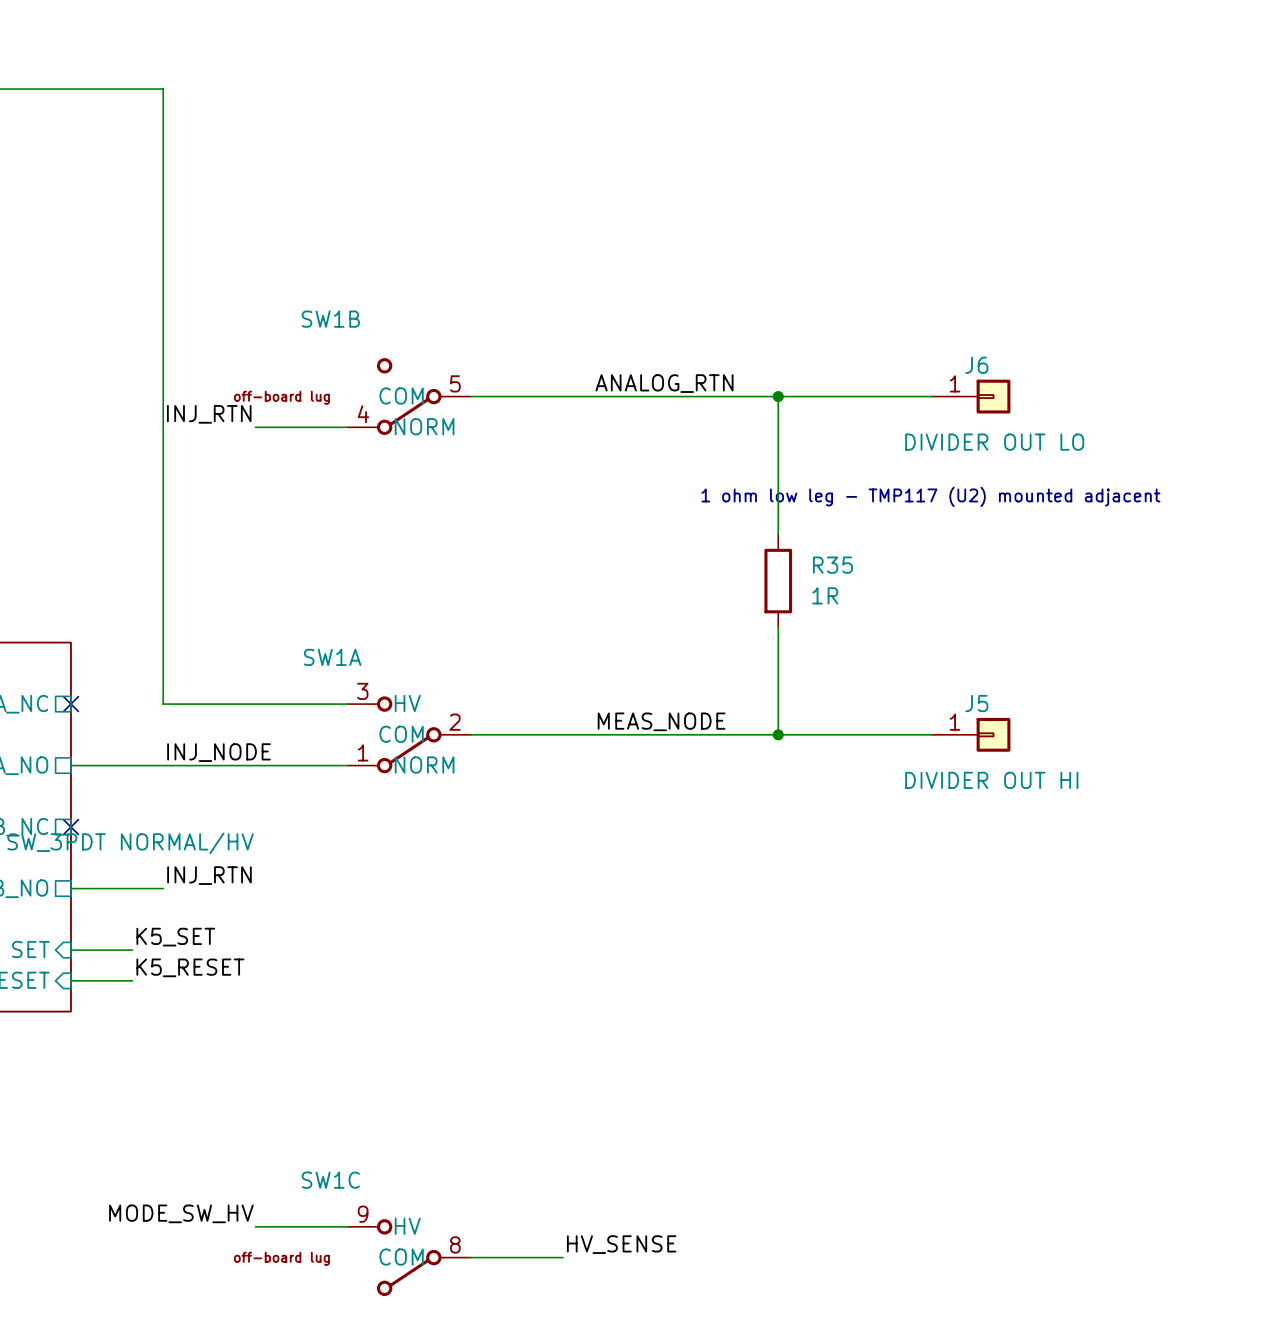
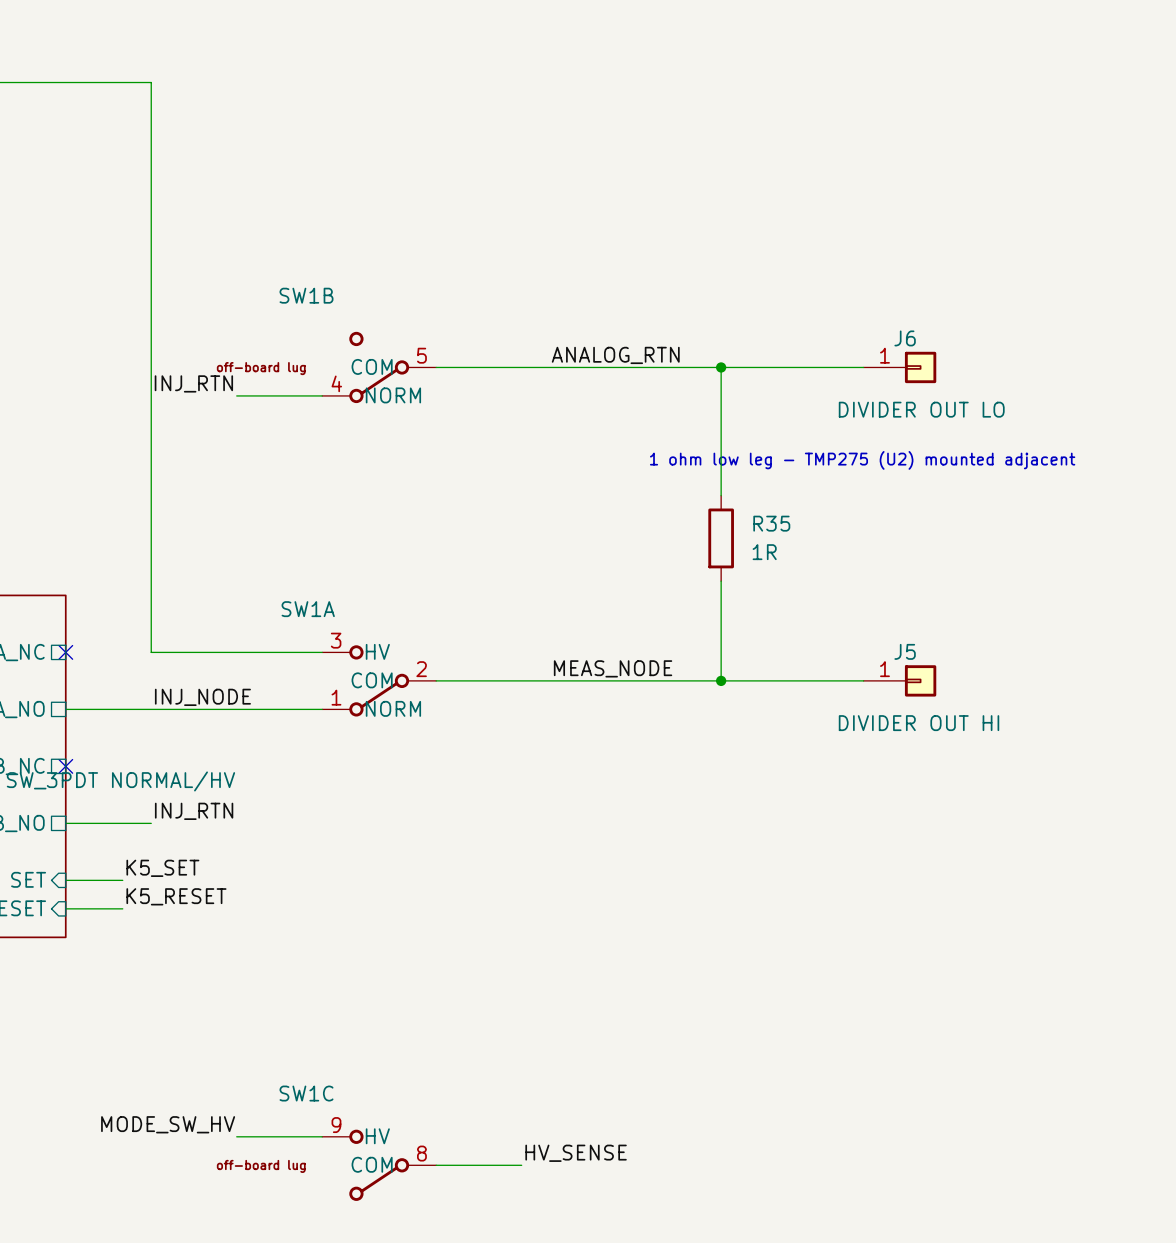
text: 1 ohm low leg - TMP117 (U2) mounted adjacent (930, 496) -> 1 ohm low leg - TMP275 (U2) mounted adjacent (862, 460)

